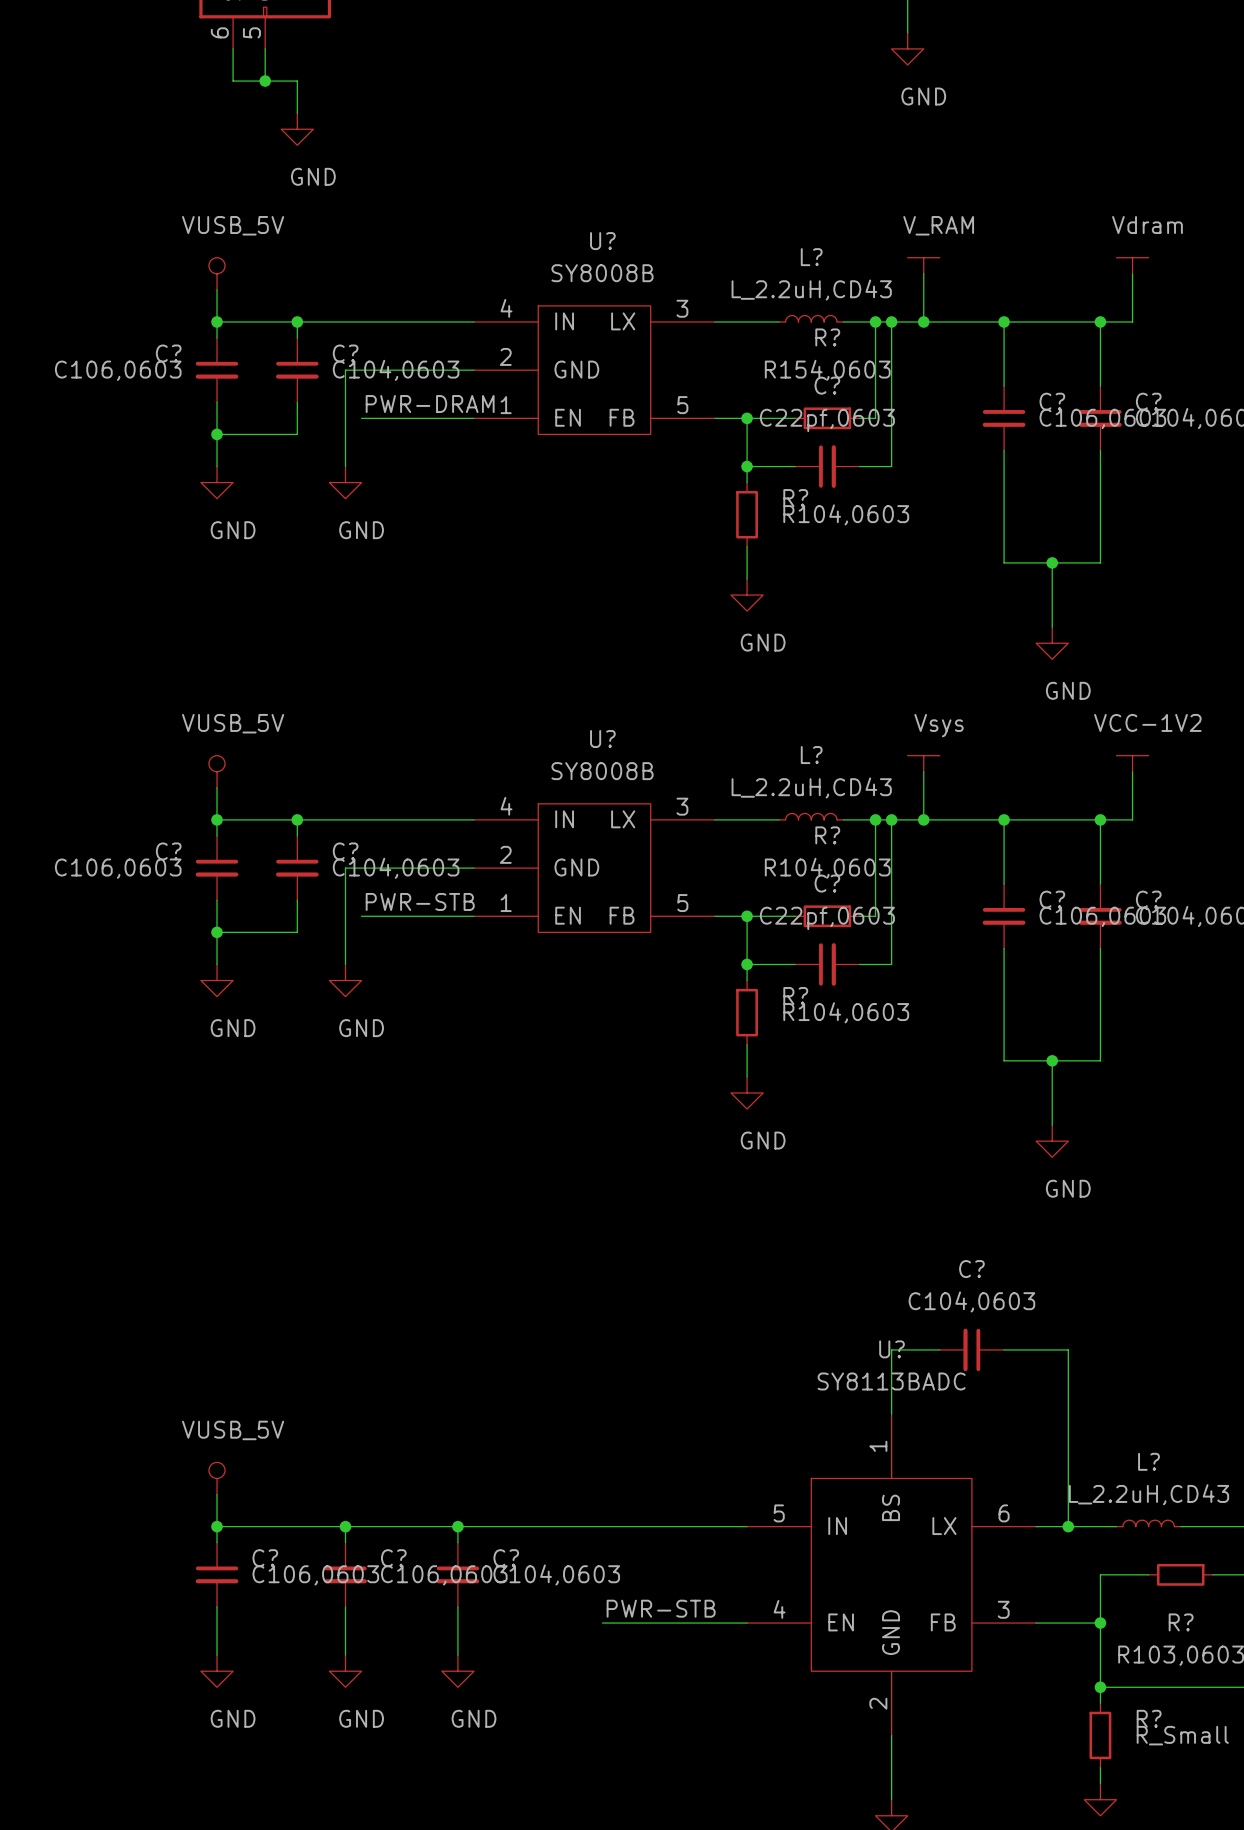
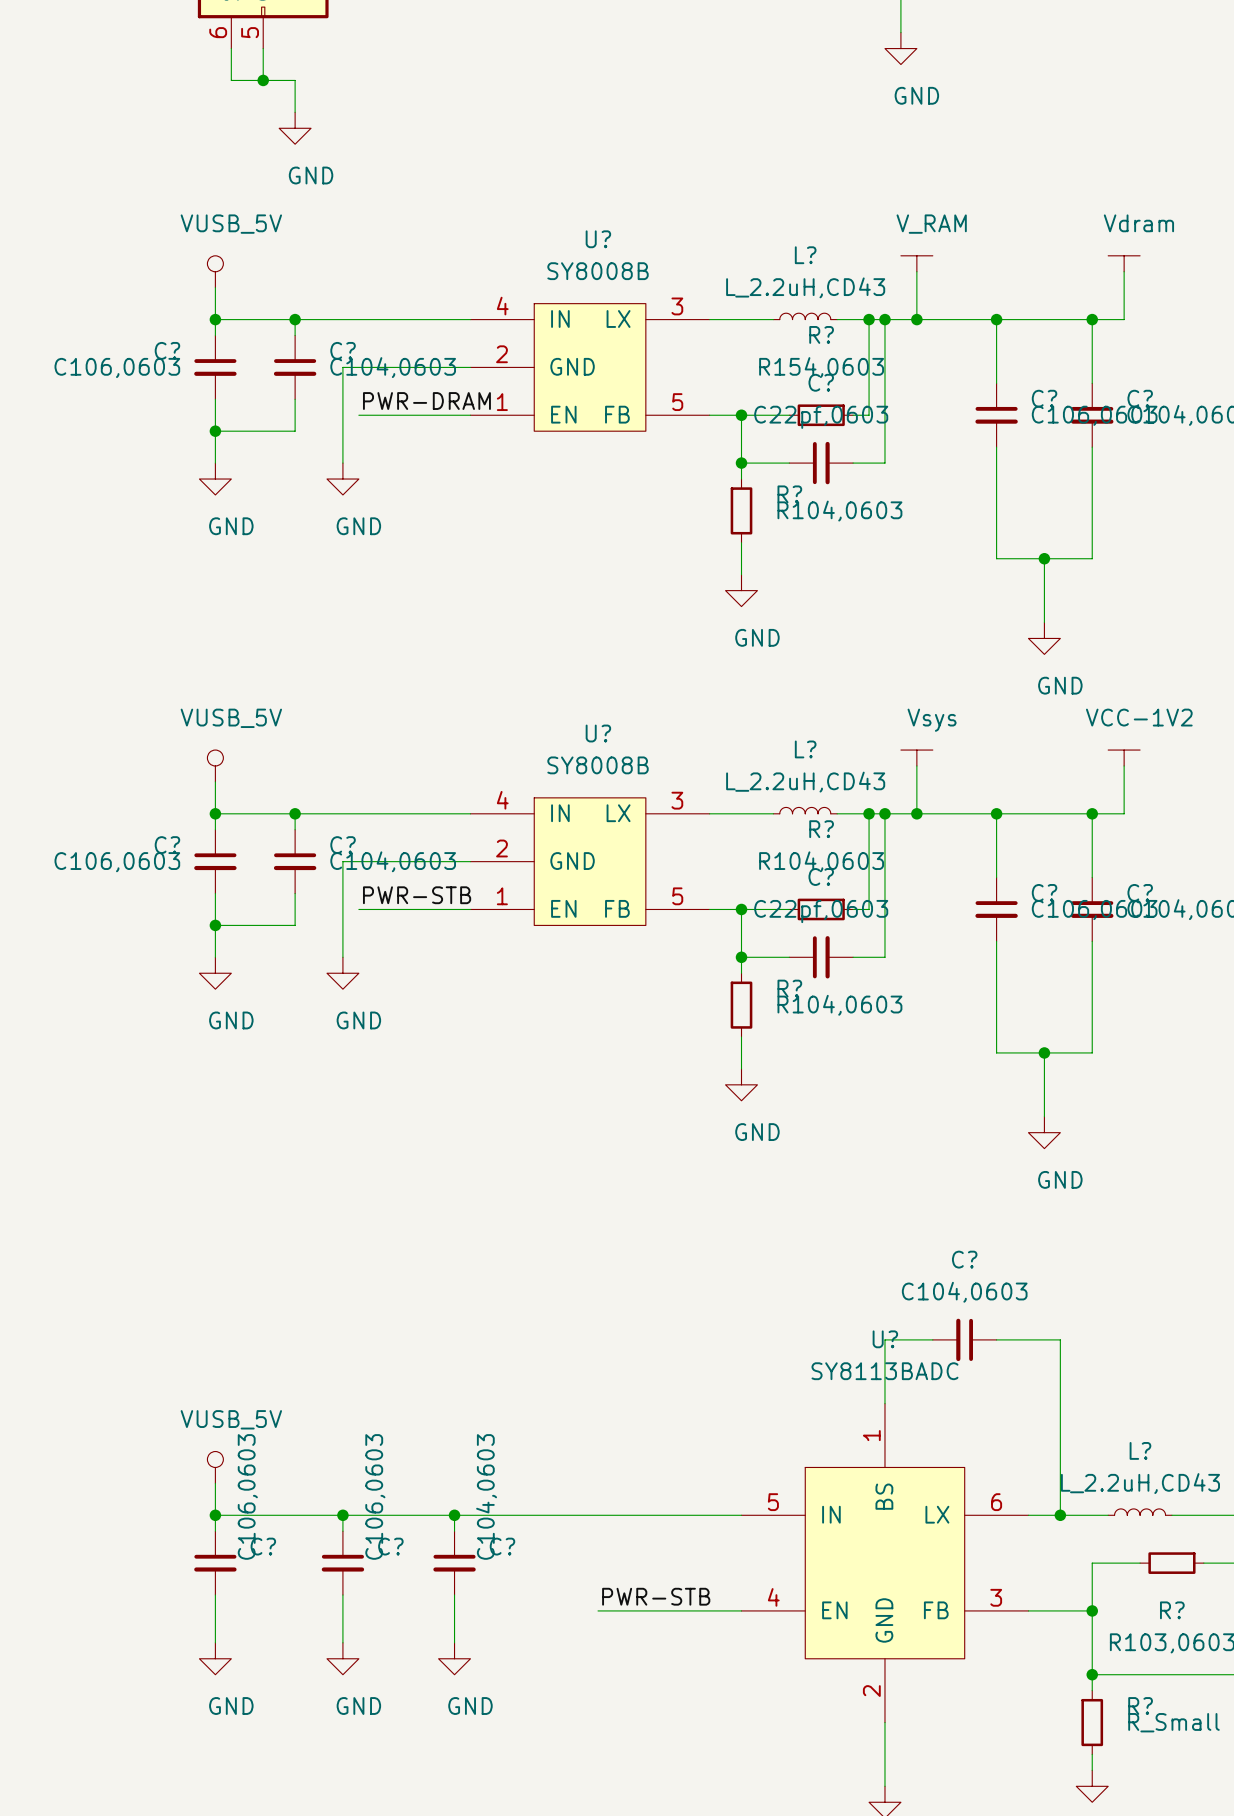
C? value rotation: 0° (315, 1575) -> 90° counterclockwise (247, 1496)
C? value rotation: 0° (444, 1575) -> 90° counterclockwise (375, 1496)
C? value rotation: 0° (556, 1575) -> 90° counterclockwise (486, 1496)

